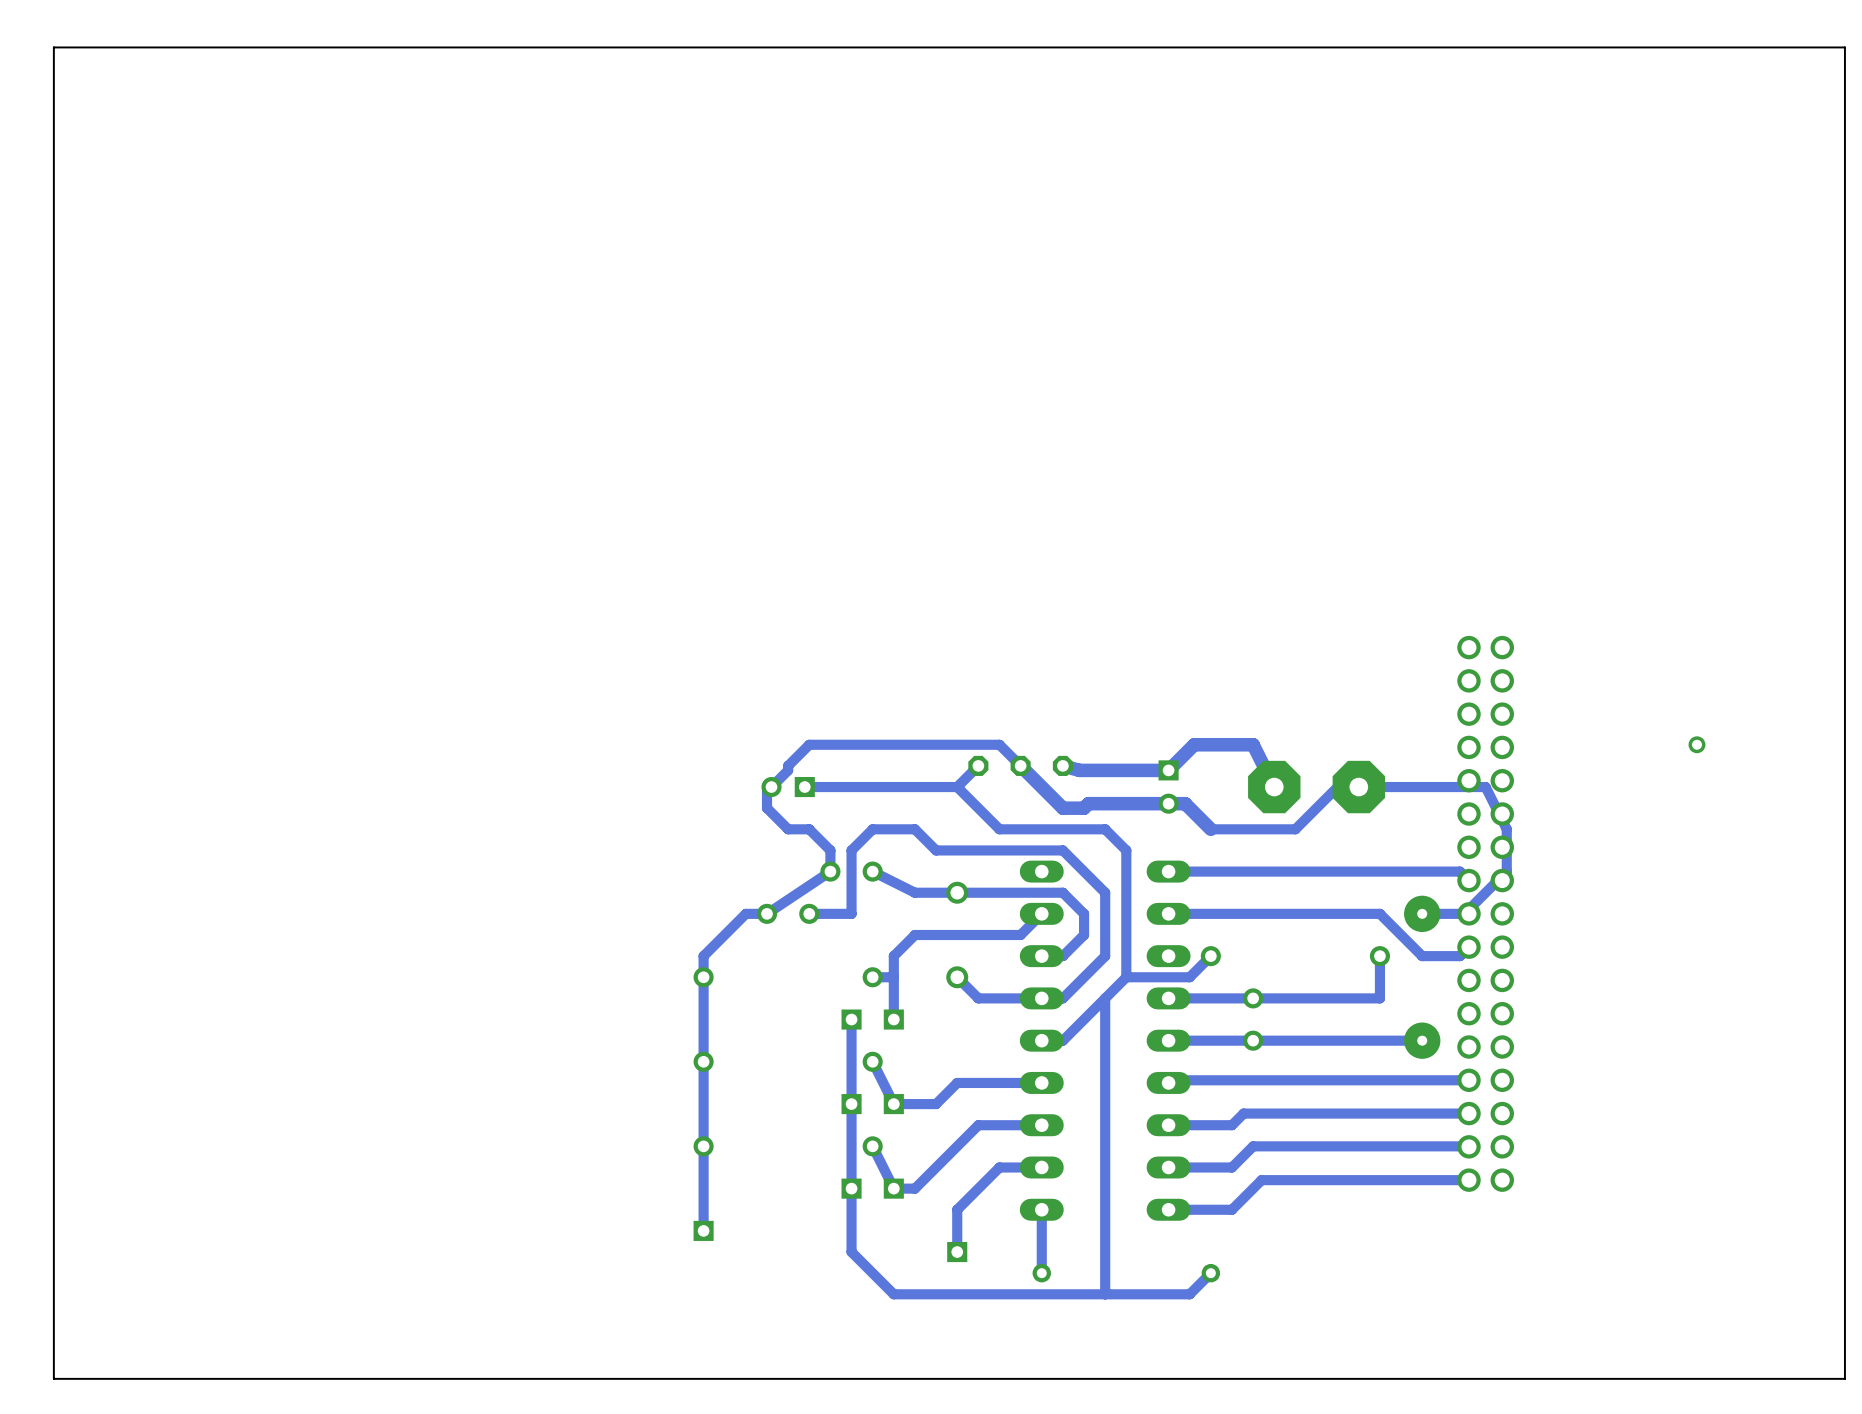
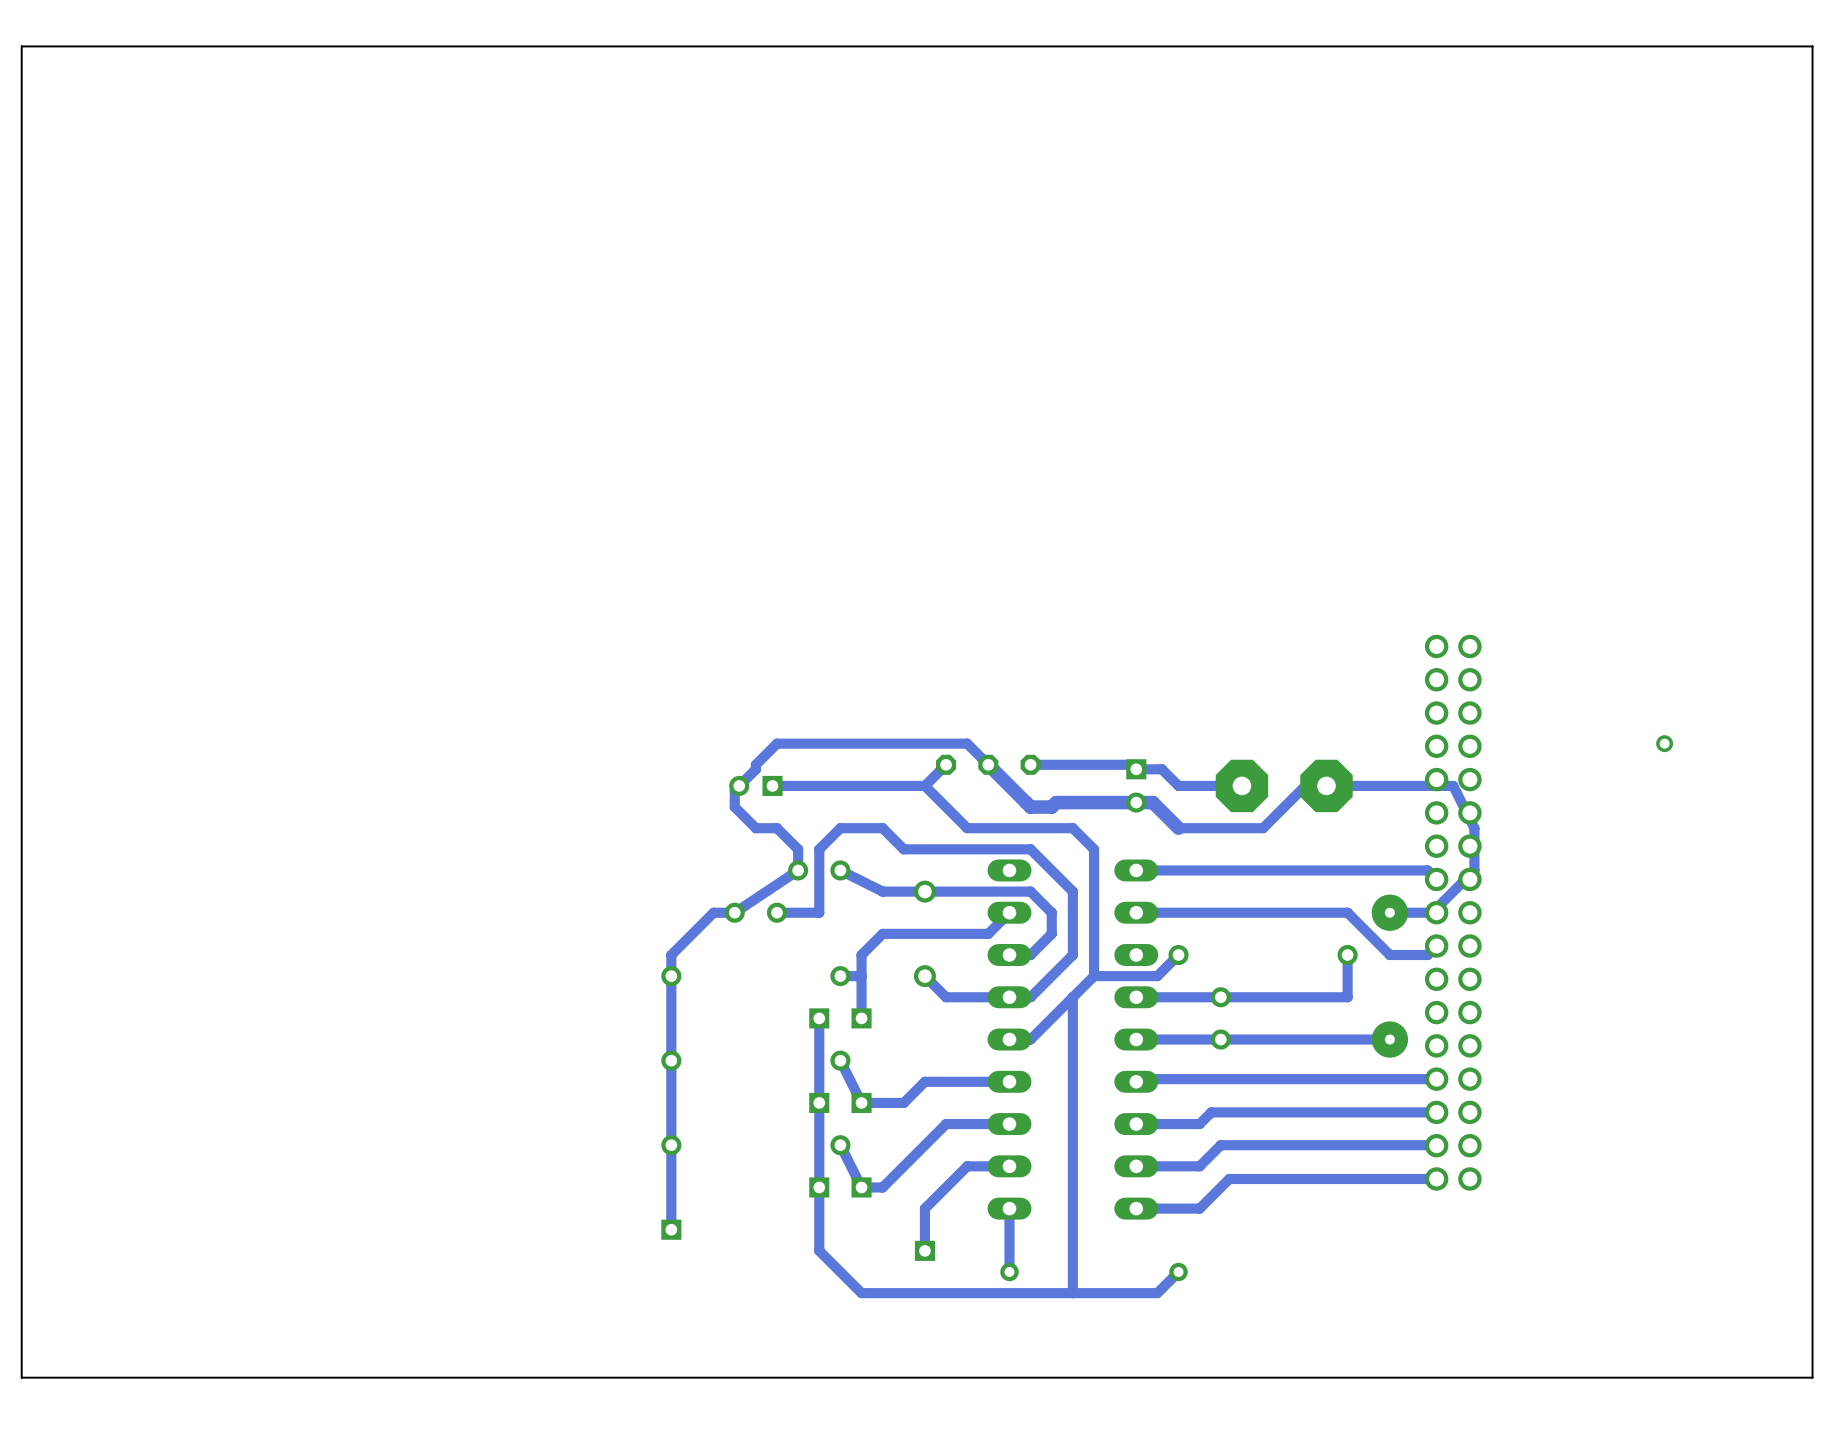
track: (1062, 765) (1079, 770) (1168, 770) (1194, 744) (1253, 744) (1274, 787) -> (1030, 764) (1131, 764) (1136, 769) (1161, 769) (1178, 785) (1241, 785)

